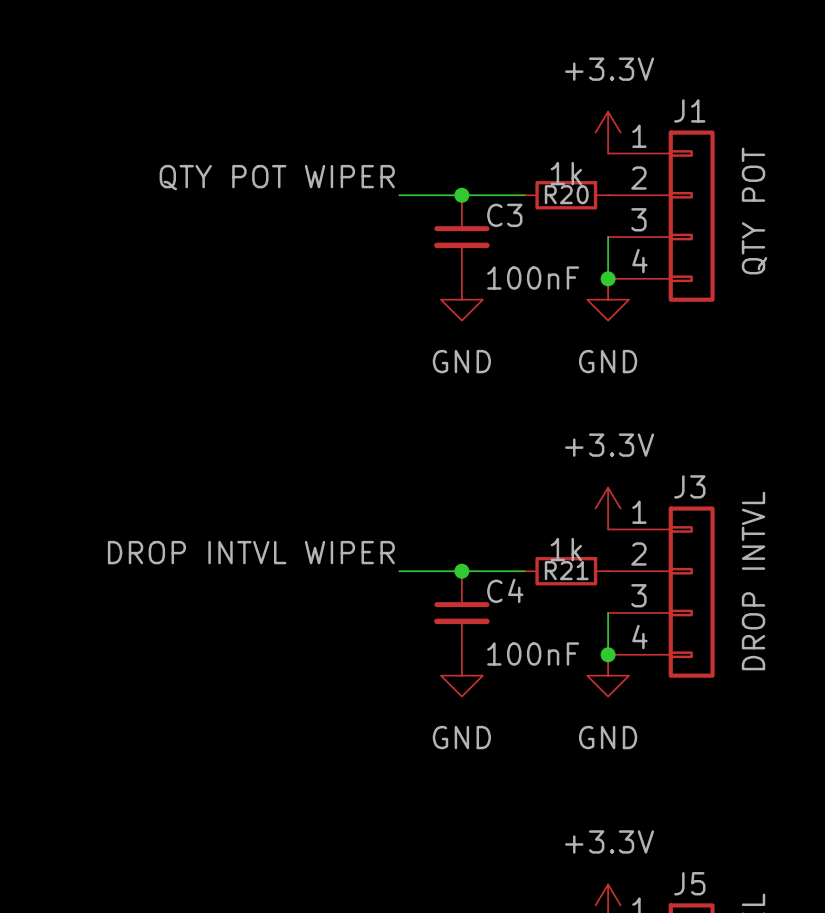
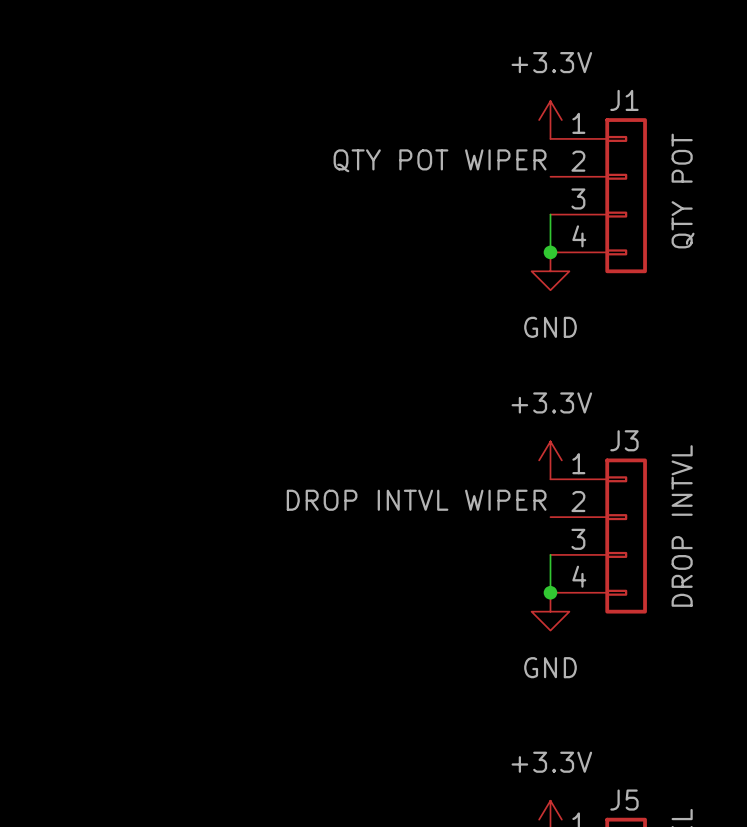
label position: QTY POT WIPER (277, 177) -> QTY POT WIPER (440, 160)
wire: (399, 195) (524, 195) -> none
junction: (461, 195) -> none
R20: 1k (566, 195) -> none
C3: 100nF (461, 237) -> none
power symbol: GND (461, 299) -> none
label position: DROP INTVL WIPER (251, 552) -> DROP INTVL WIPER (416, 500)
wire: (399, 571) (524, 571) -> none
junction: (461, 571) -> none
R21: 1k (566, 571) -> none
C4: 100nF (461, 613) -> none
power symbol: GND (461, 675) -> none

